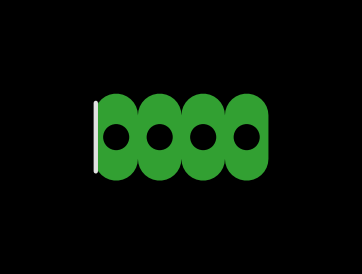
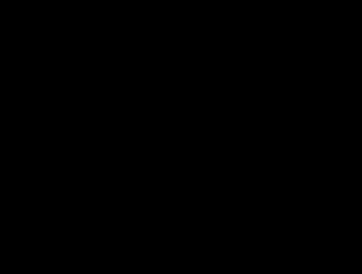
part: (181, 137) -> none

